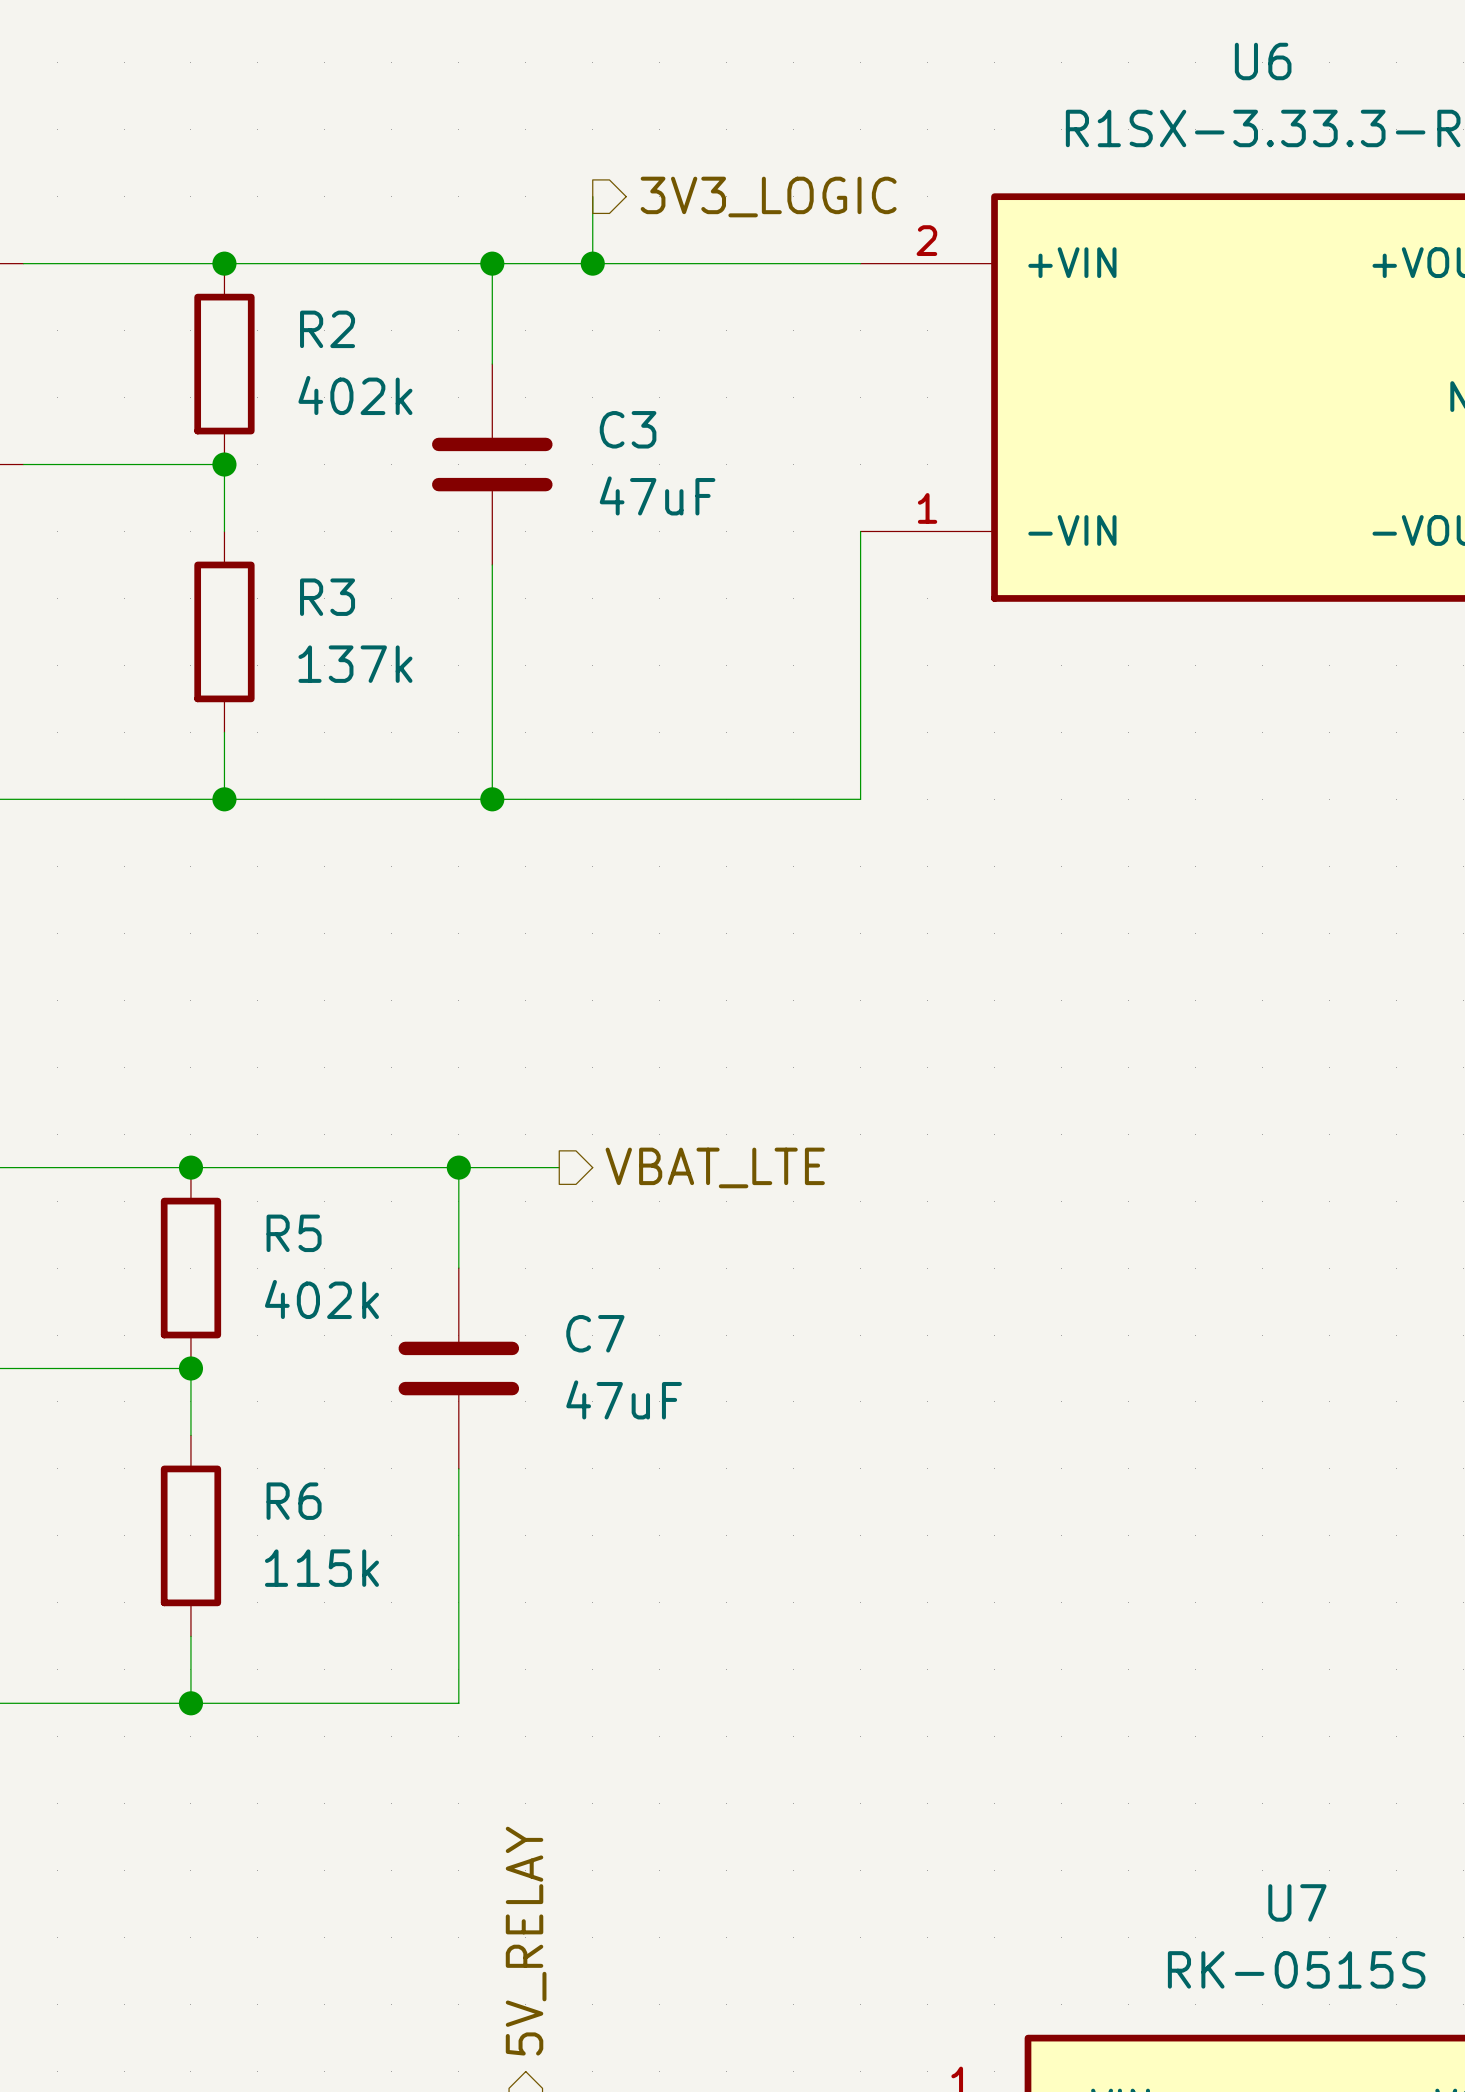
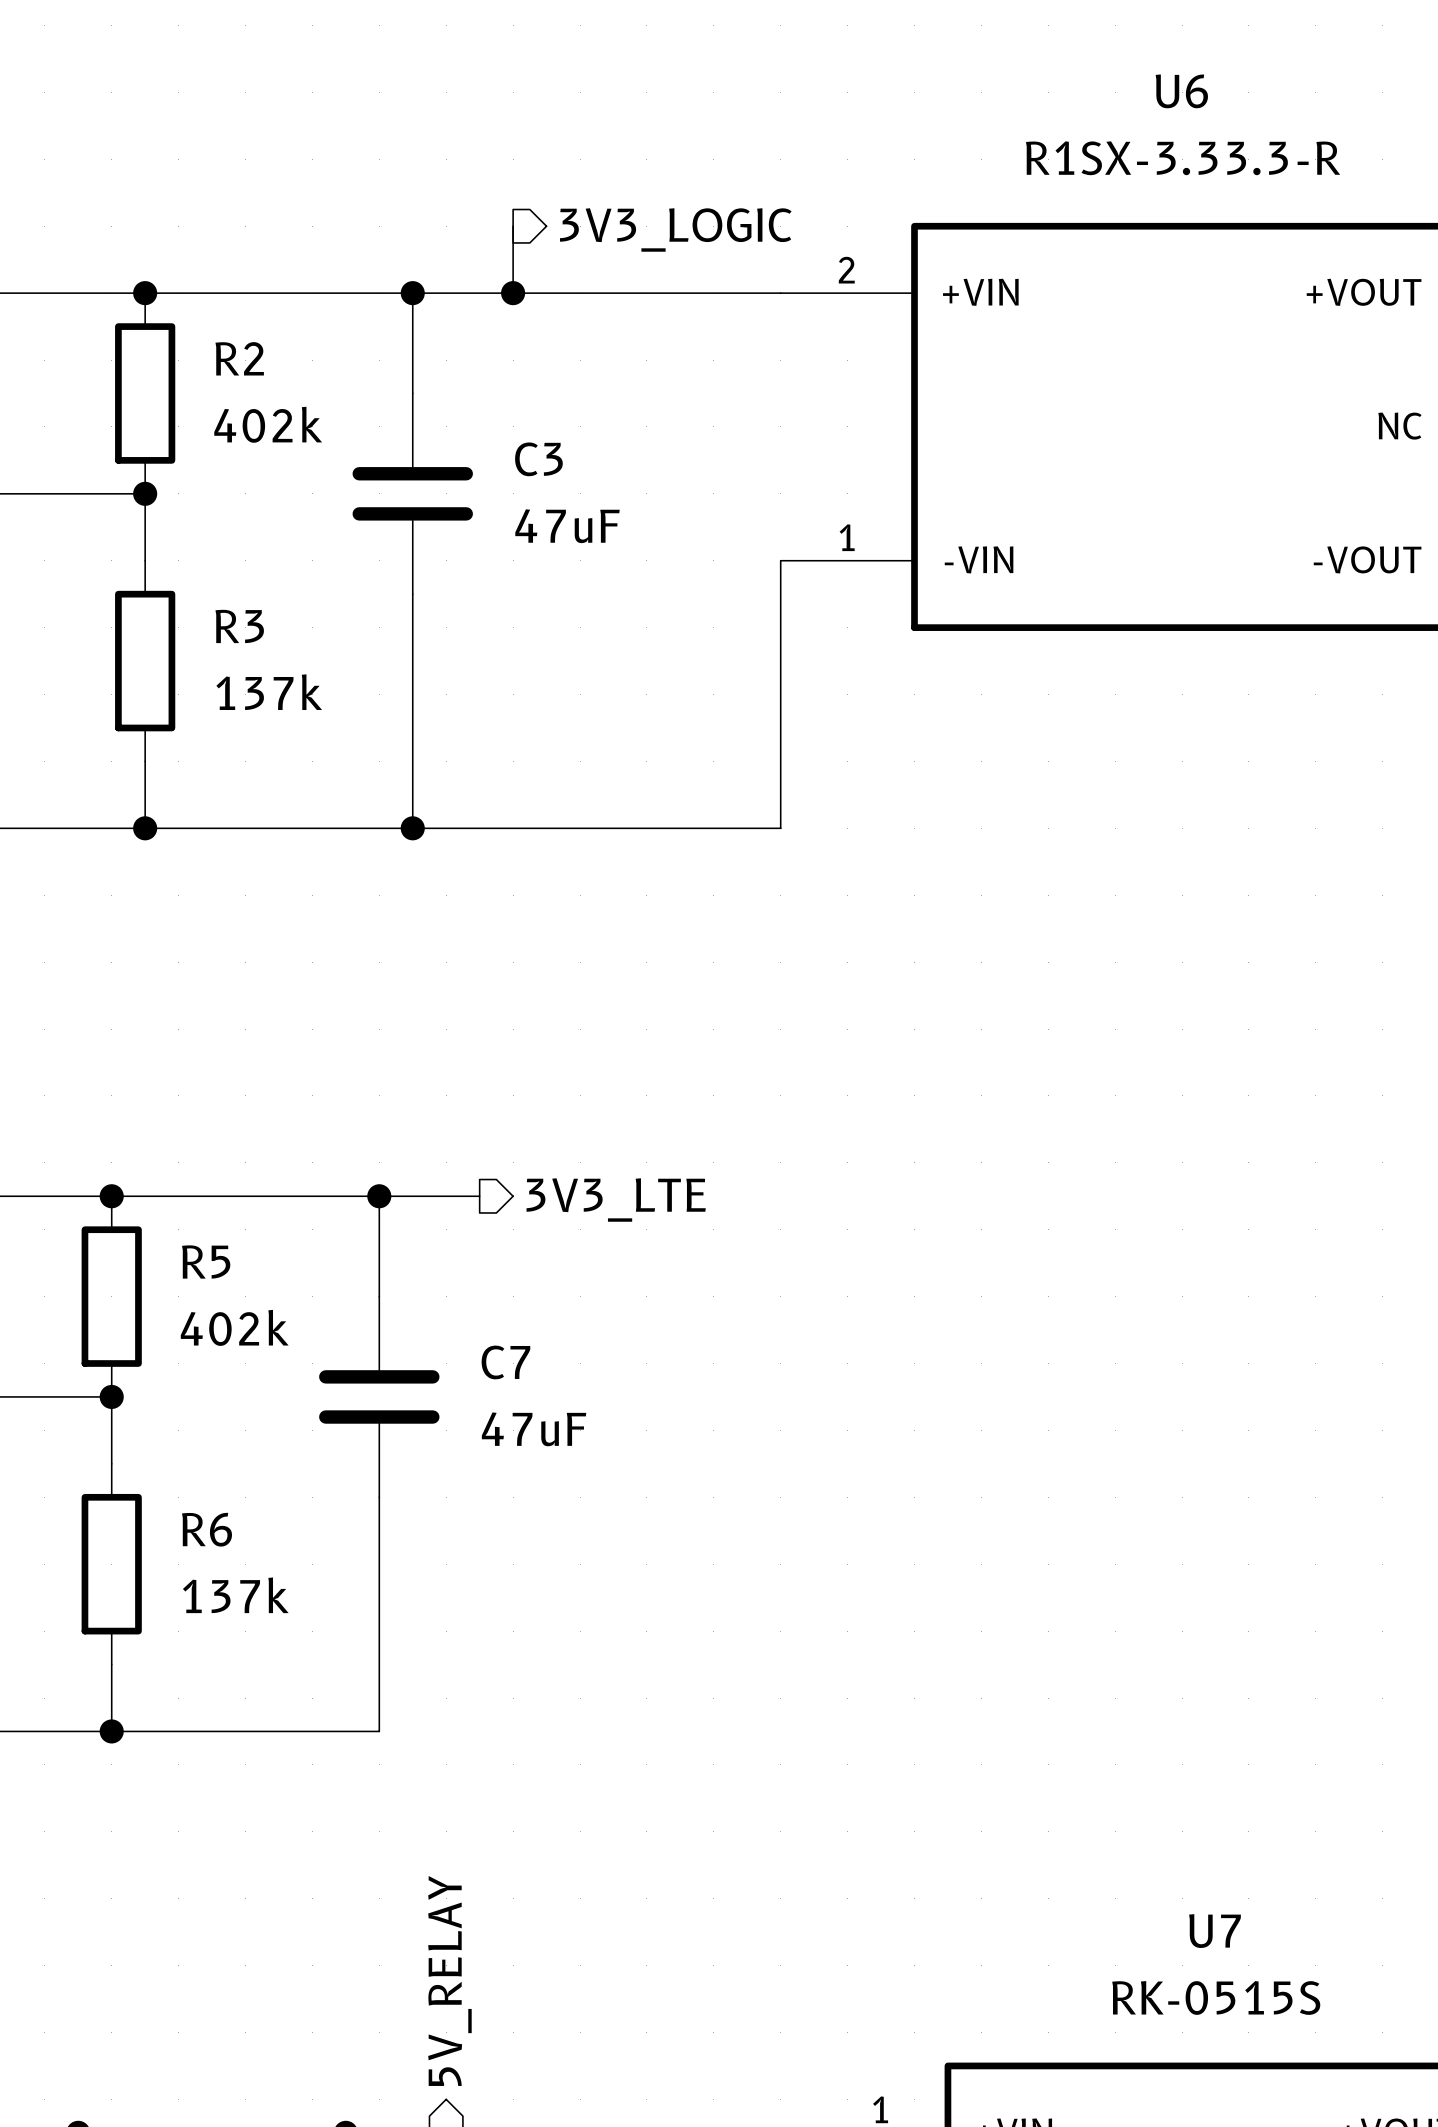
hierarchical label: VBAT_LTE (715, 1167) -> 3V3_LTE (616, 1200)
R6 value: 115k (321, 1568) -> 137k (235, 1595)

